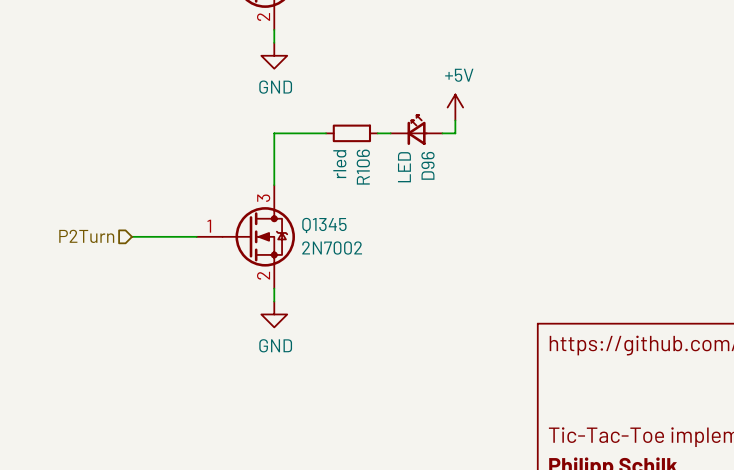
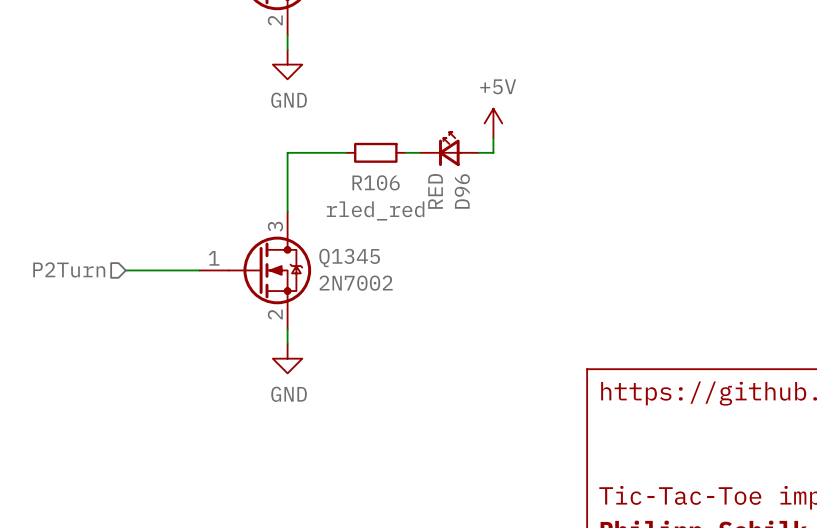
R106 value: rled (339, 164) -> rled_red (375, 210)
R106 name rotation: 0° (363, 167) -> 90° clockwise (376, 182)
D96 value: LED (404, 167) -> RED (435, 191)

